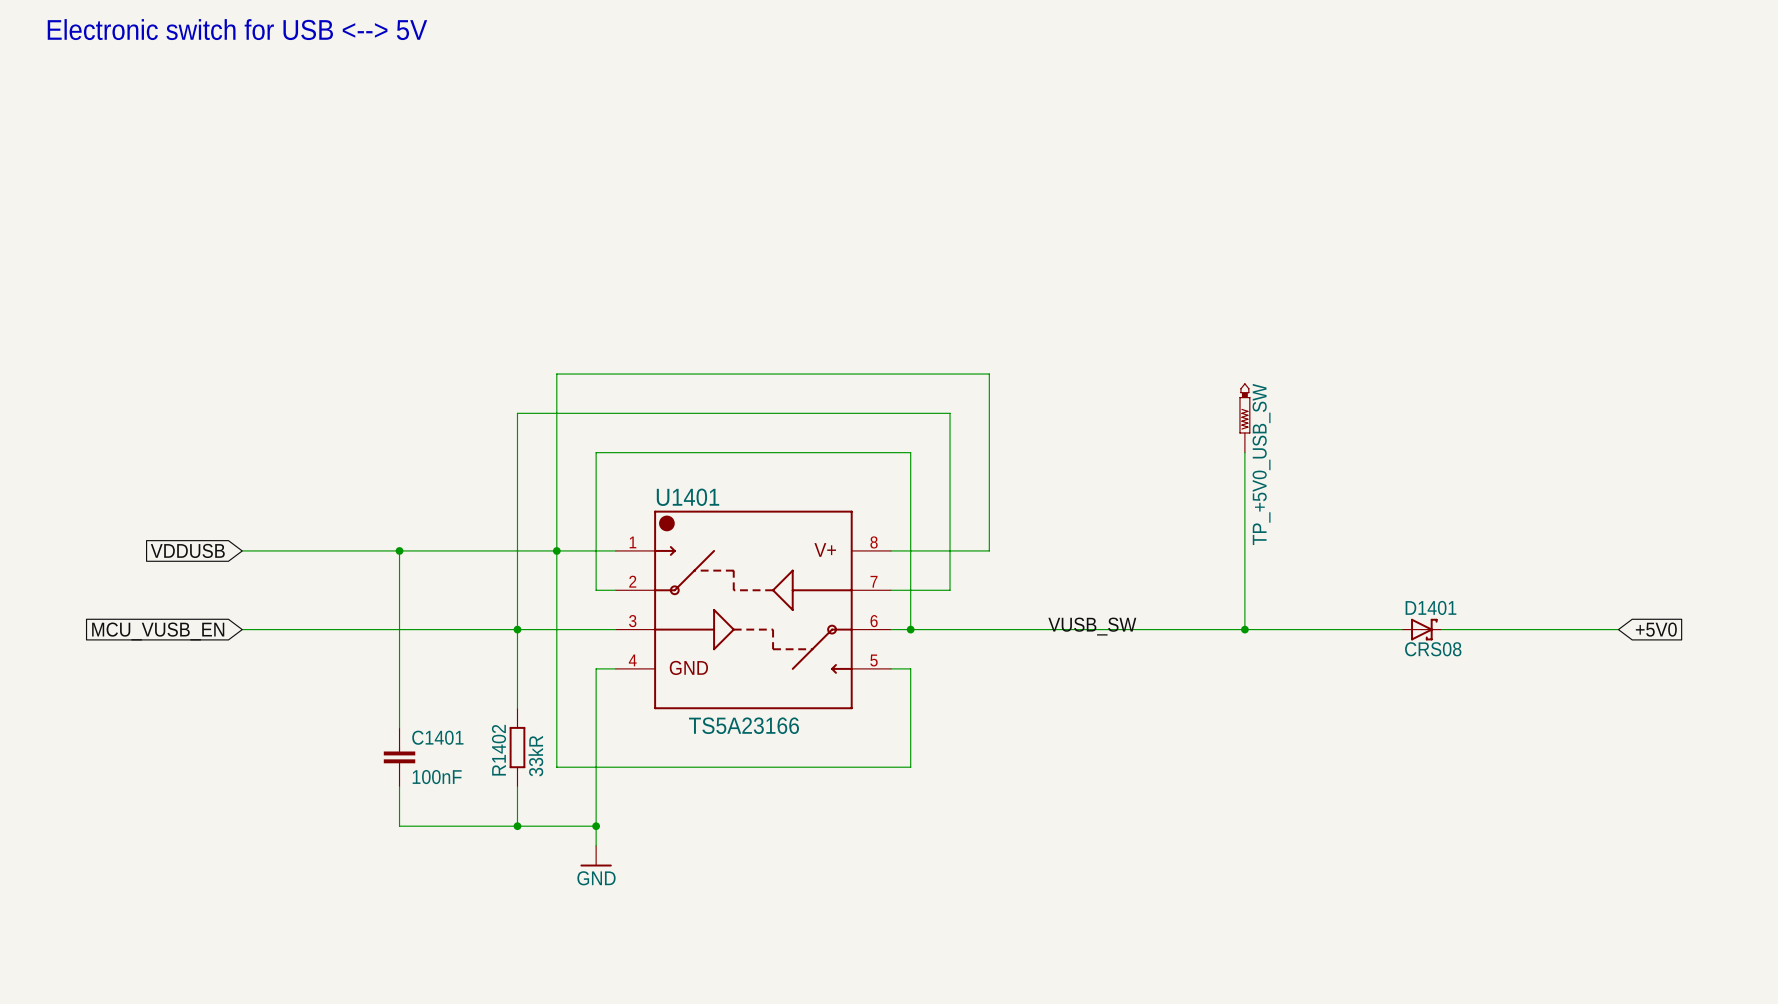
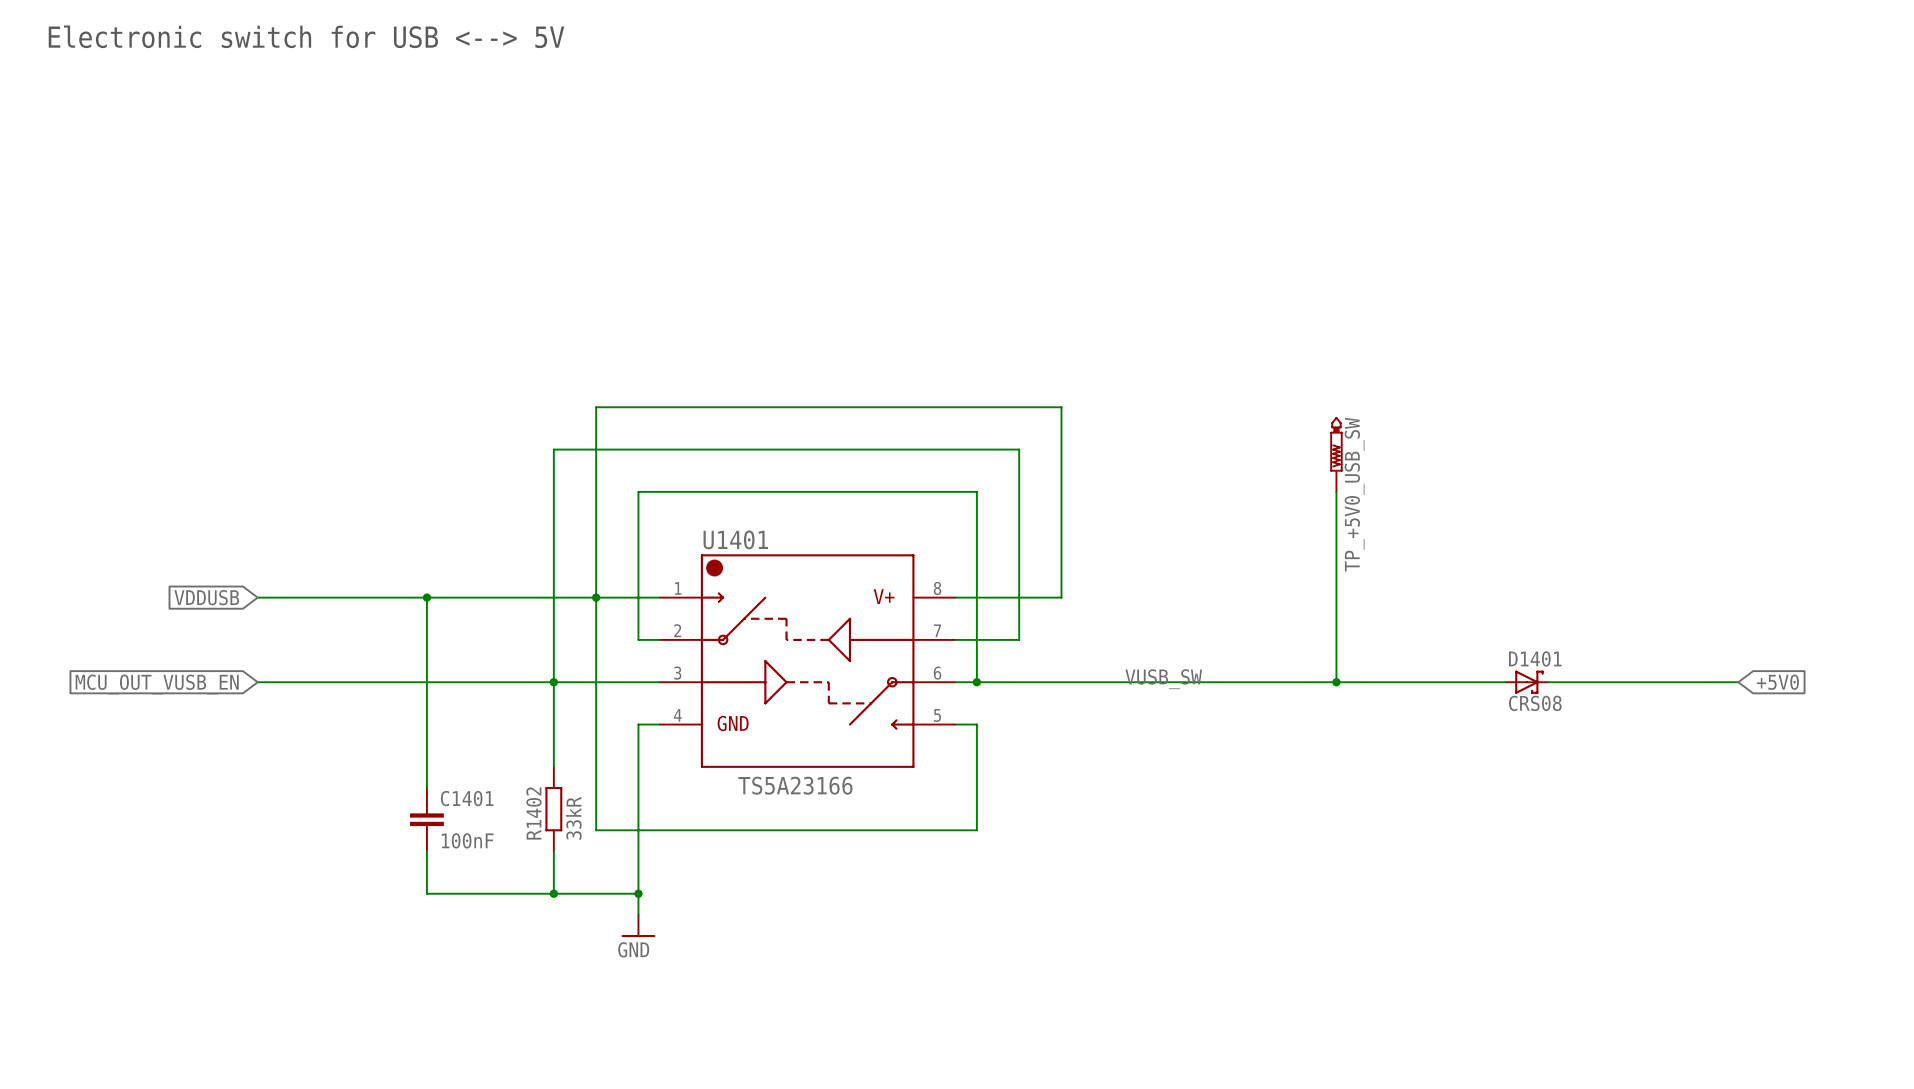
global label: MCU_VUSB_EN (158, 631) -> MCU_OUT_VUSB_EN (157, 684)

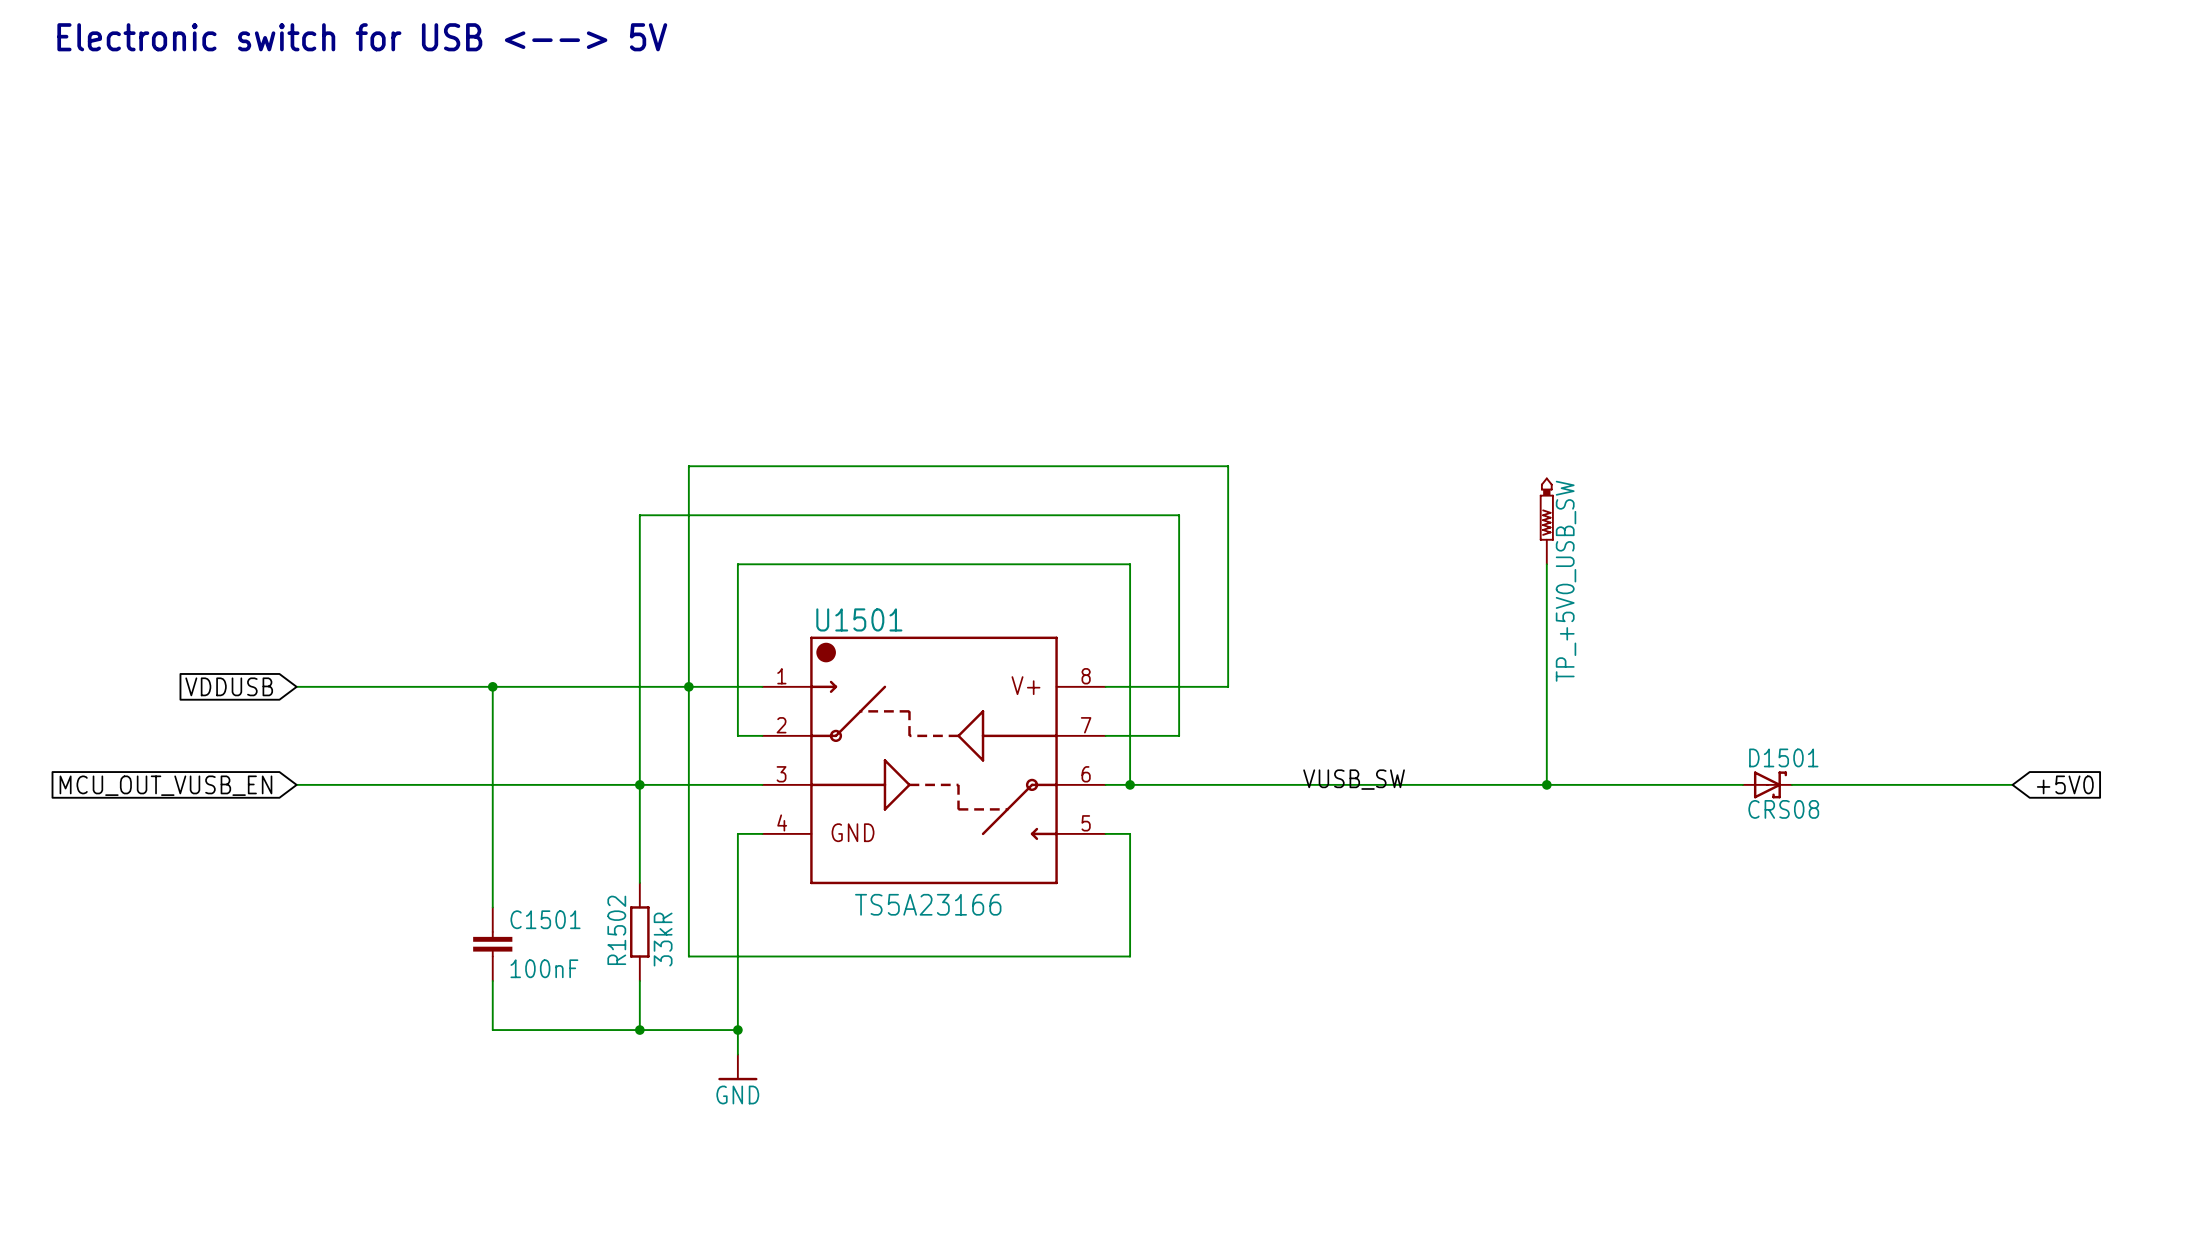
U1401 name: U1401 (735, 539) -> U1501 (859, 619)
D1401 name: D1401 (1535, 658) -> D1501 (1783, 757)
C1401 name: C1401 (467, 798) -> C1501 (545, 919)
R1402 name: R1402 (533, 813) -> R1502 (616, 930)

